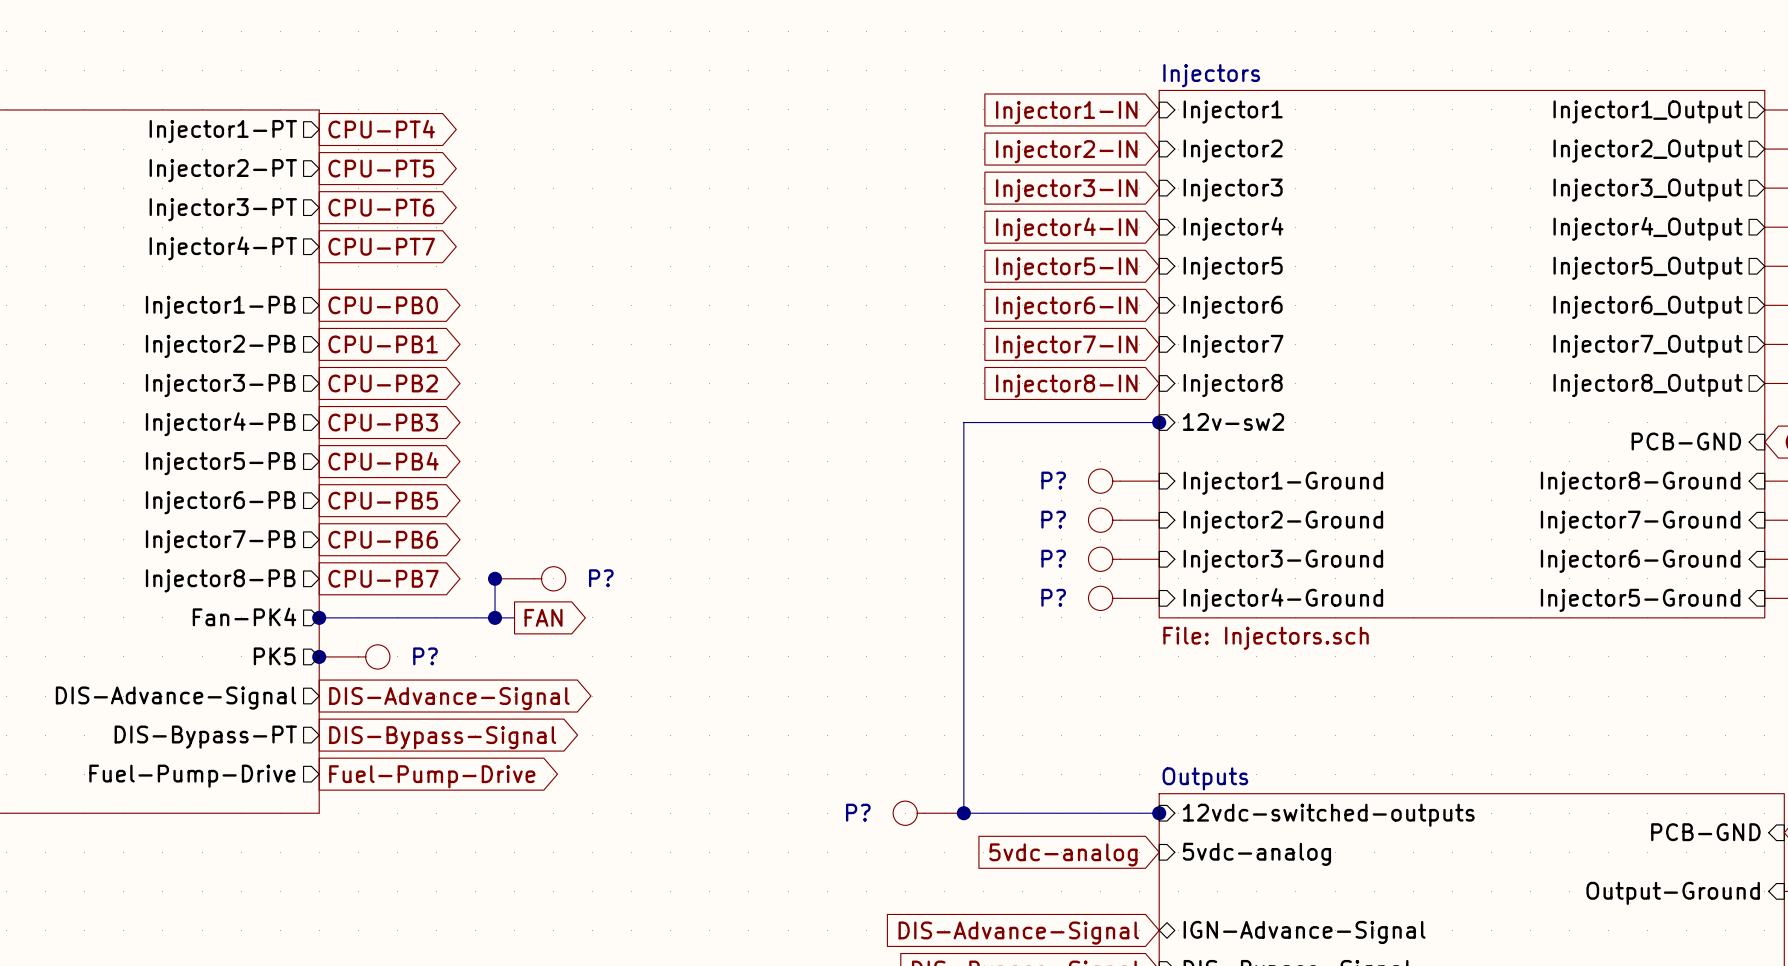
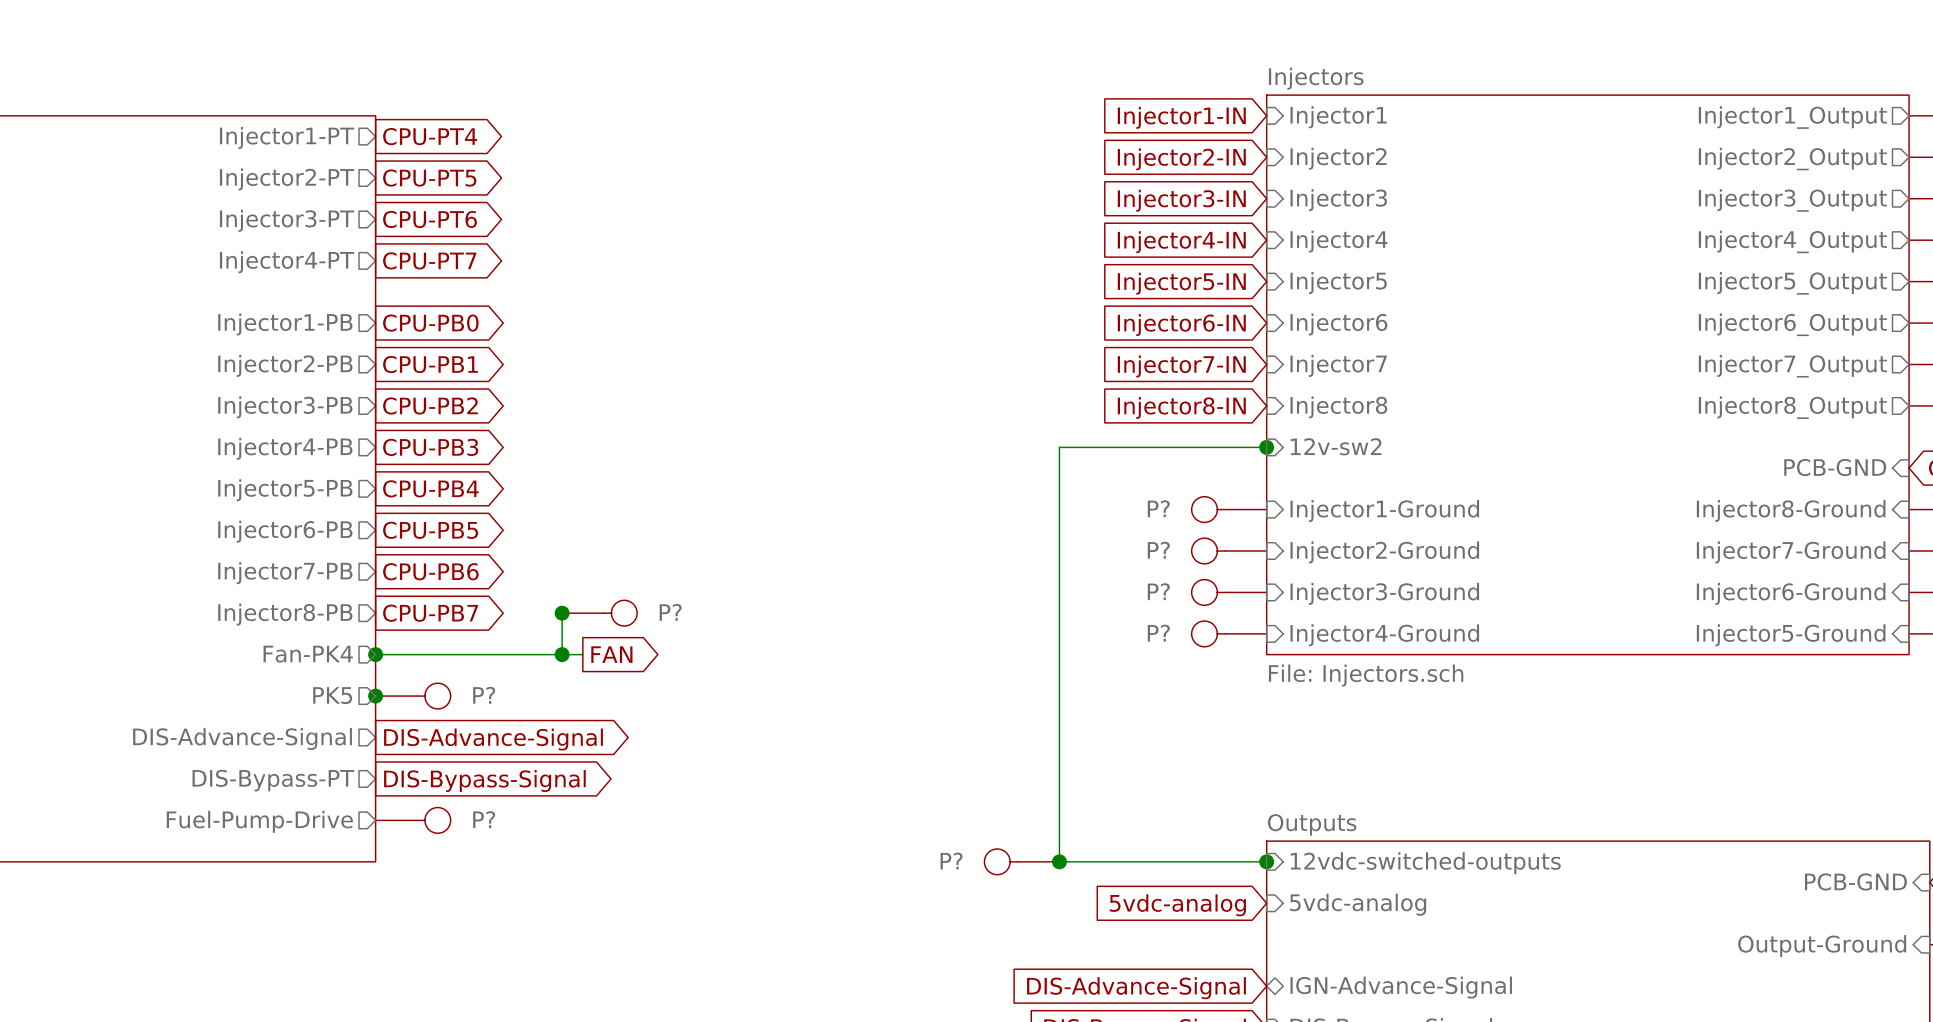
P?: none -> (413, 820)
global label: Fuel-Pump-Drive (432, 776) -> none

